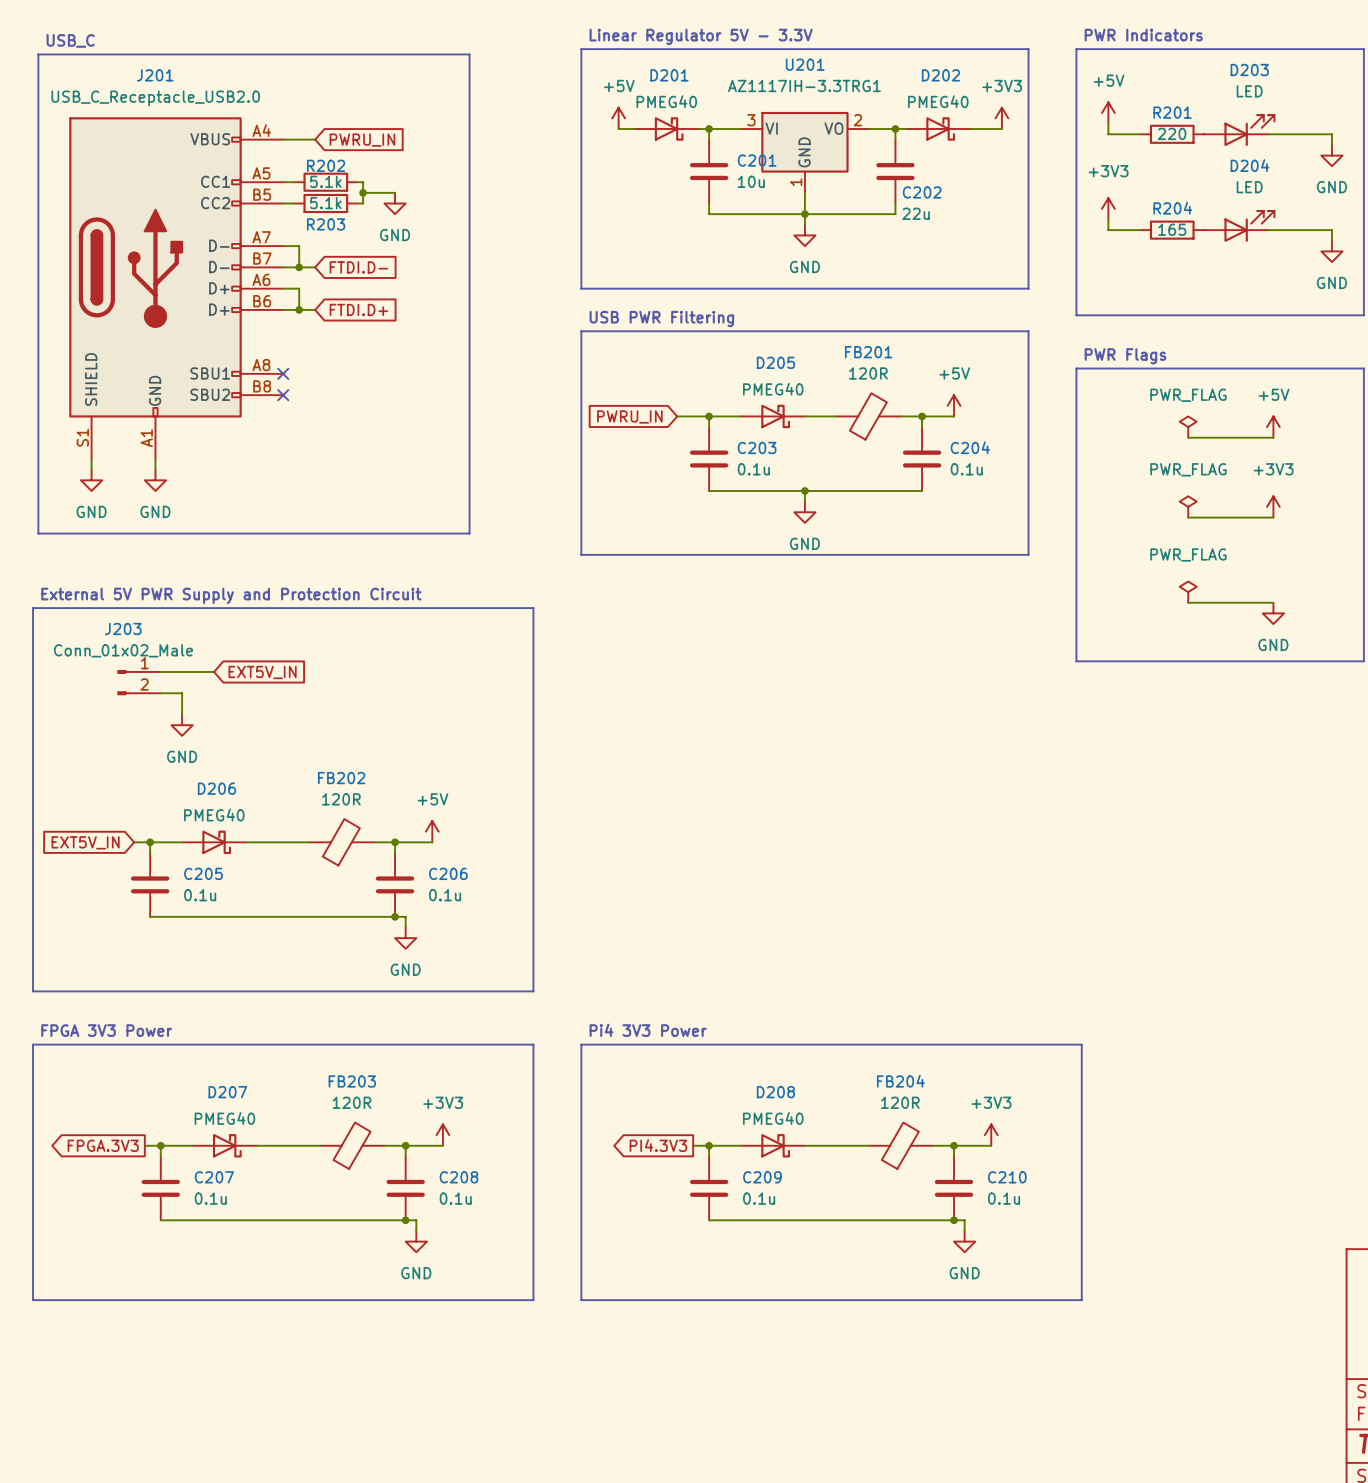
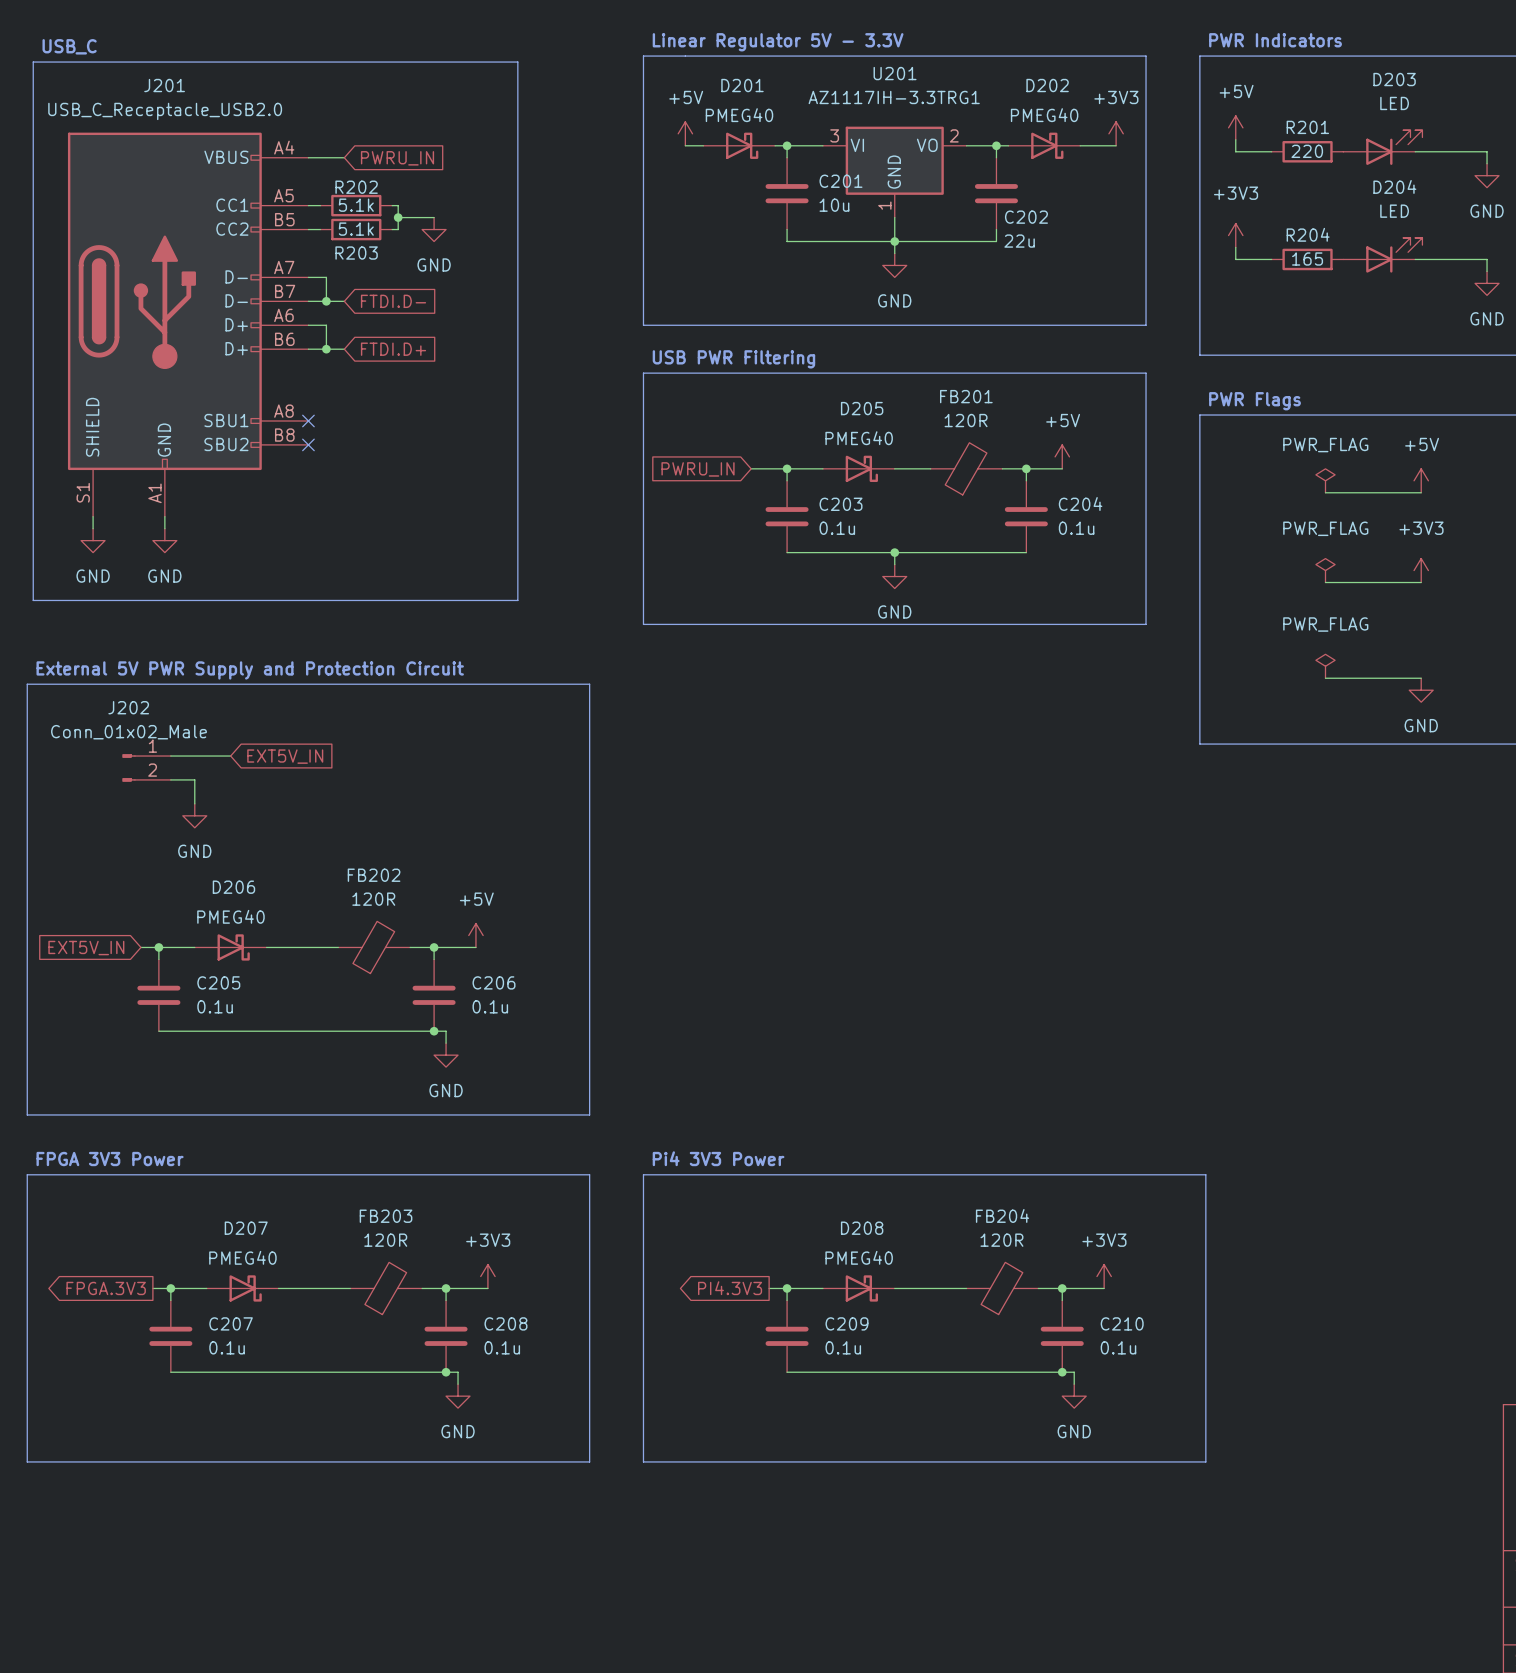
J203 name: J203 (123, 628) -> J202 (128, 707)

